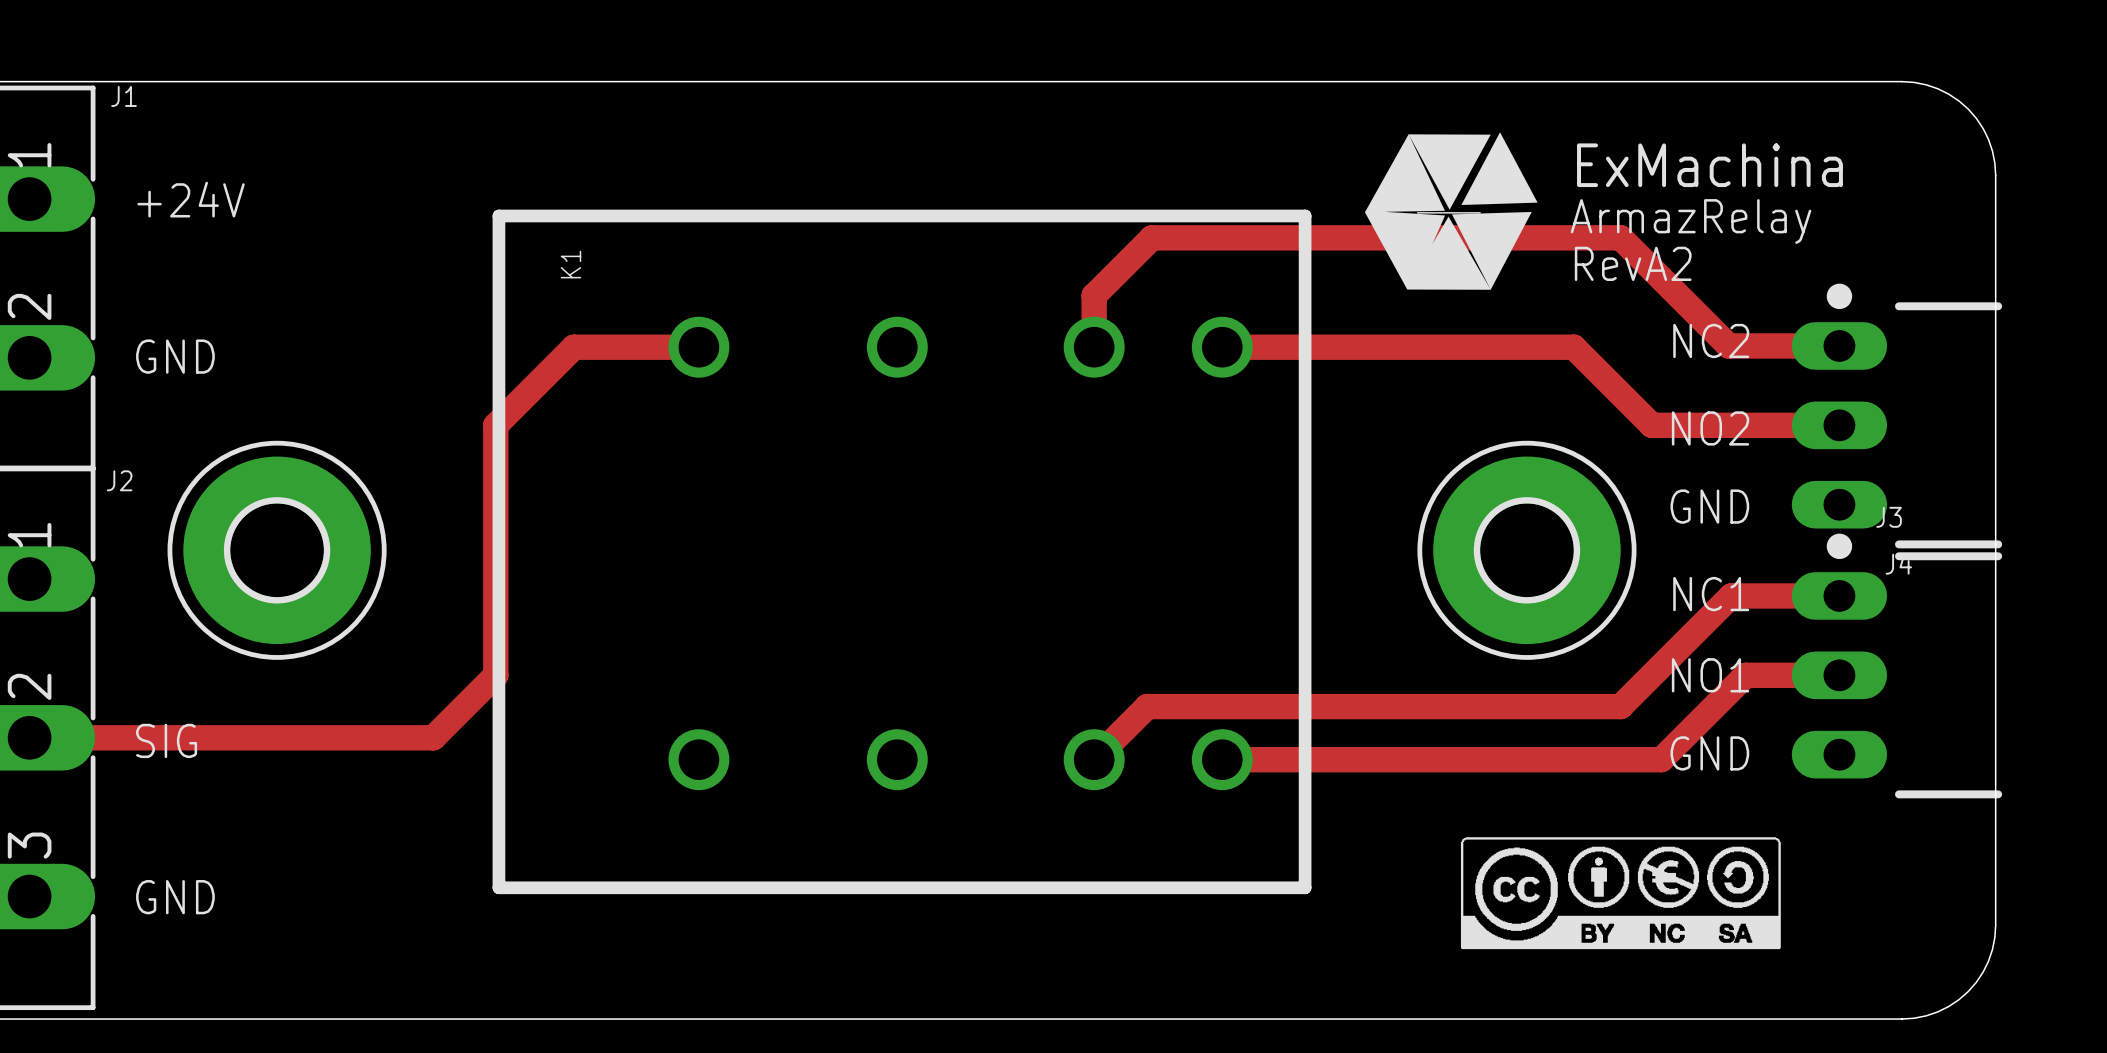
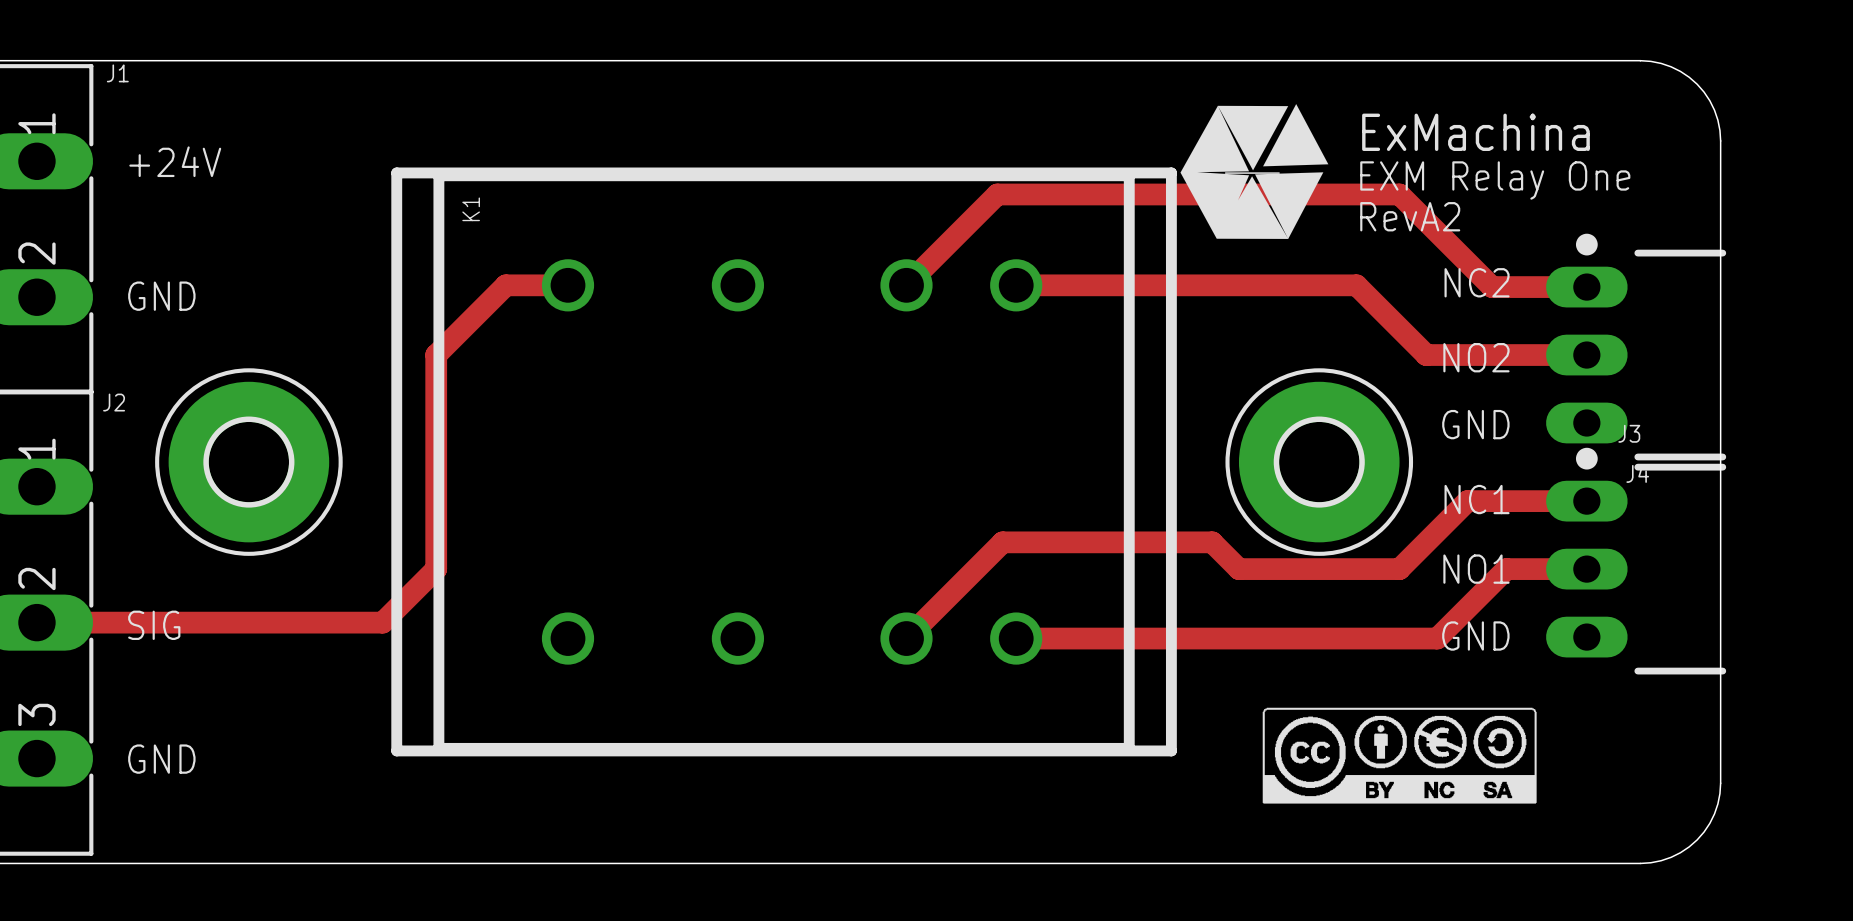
K1 footprint: [492, 209, 1312, 895] -> [391, 167, 1177, 757]
text: ArmazRelay (1691, 221) -> EXM Relay One (1495, 180)
top track: (1152, 237) (1094, 295) (1094, 347) -> (998, 194) (906, 285)
top track: (573, 347) (698, 347) -> (503, 288) (505, 285) (568, 285)
top track: (1222, 347) (1573, 347) -> (1016, 285) (1356, 285) (1359, 288)
top track: (1731, 595) (1620, 706) (1147, 706) (1094, 759) -> (1494, 501) (1467, 501) (1399, 569) (1238, 569) (1212, 542) (1002, 542) (906, 638)
top track: (1664, 756) (1661, 759) (1222, 759) -> (1437, 638) (1016, 638)

